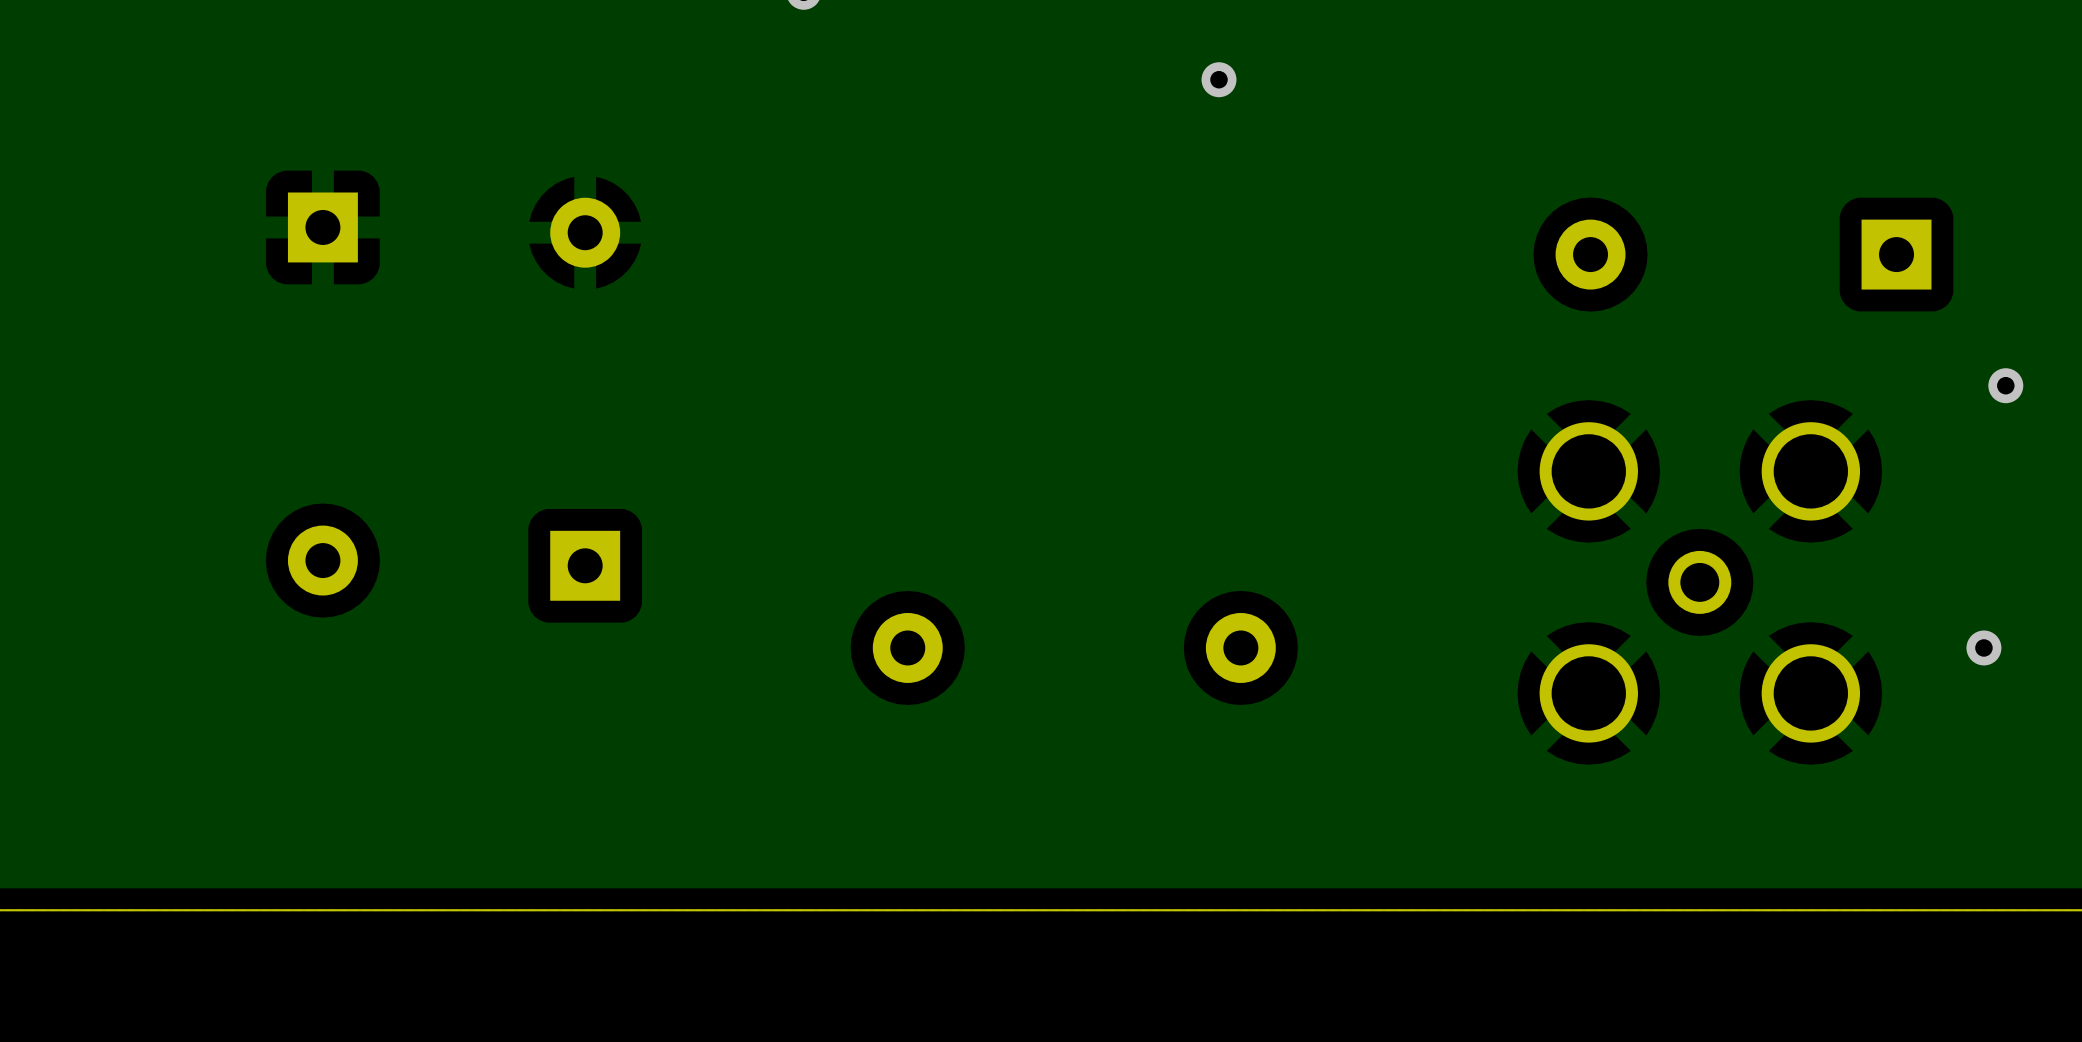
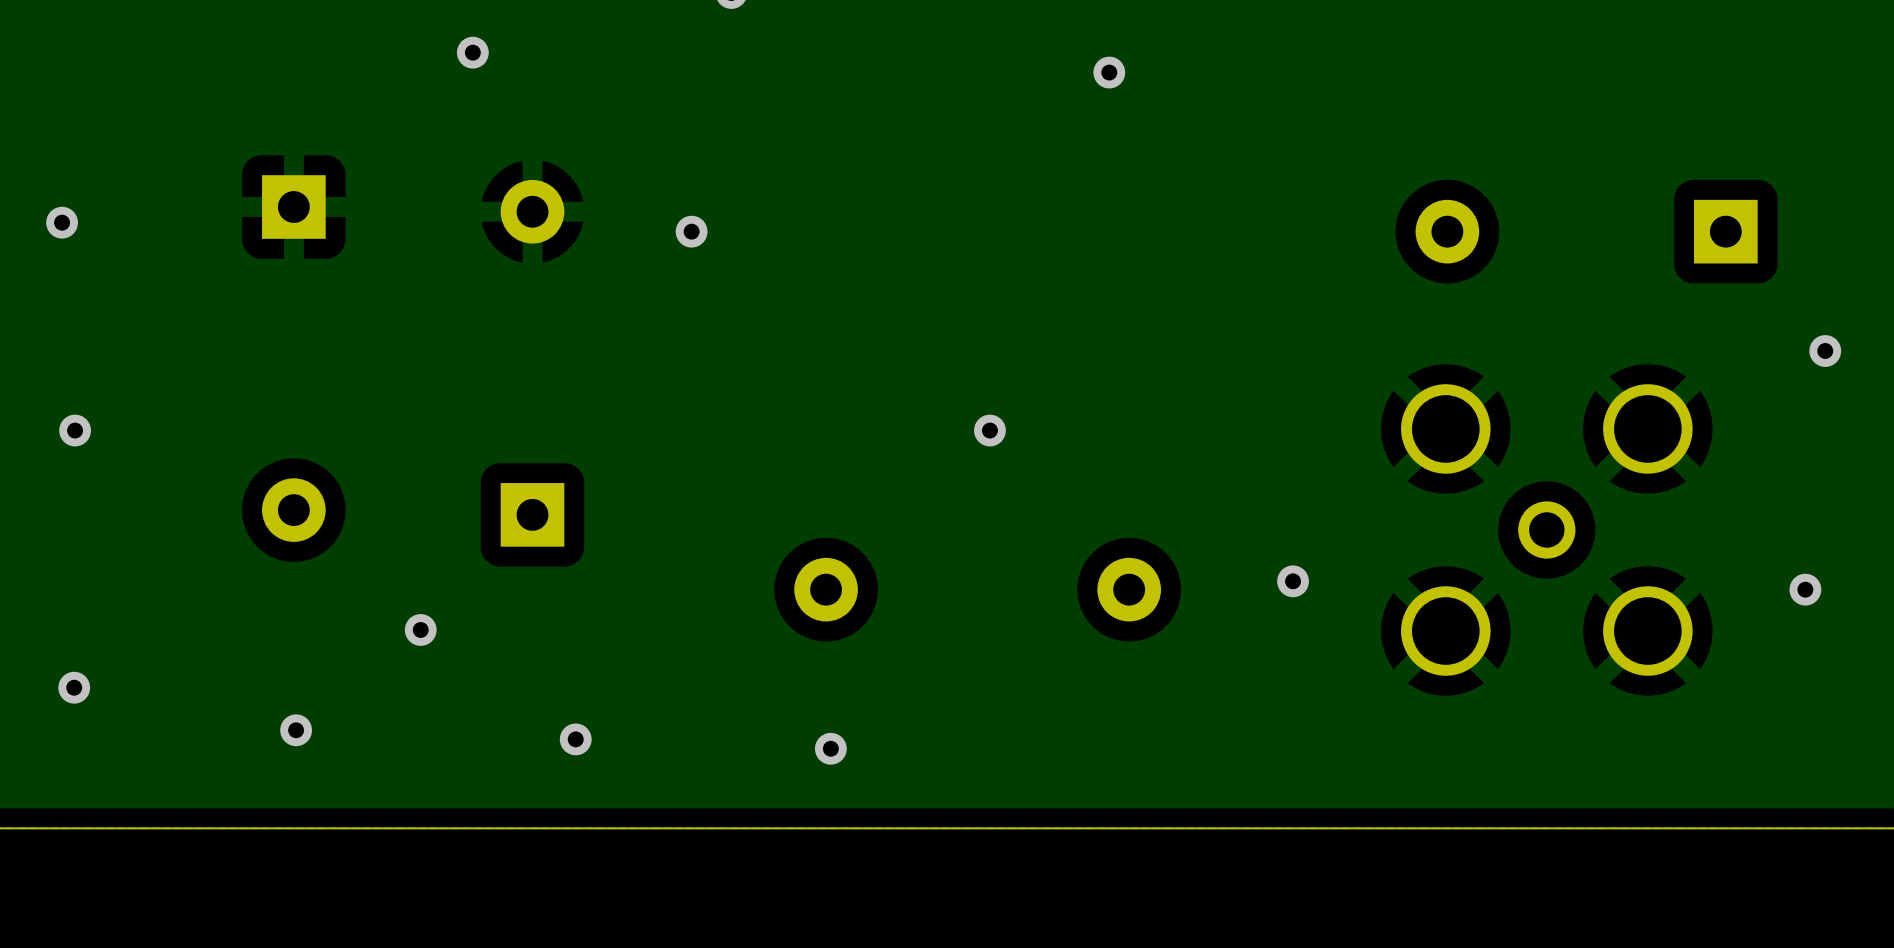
via: none -> (472, 52)
via: none -> (62, 222)
via: none -> (691, 231)
via: none -> (75, 430)
via: none -> (989, 430)
via: none -> (1293, 581)
via: none -> (420, 629)
via: none -> (74, 687)
via: none -> (296, 730)
via: none -> (575, 739)
via: none -> (830, 748)

